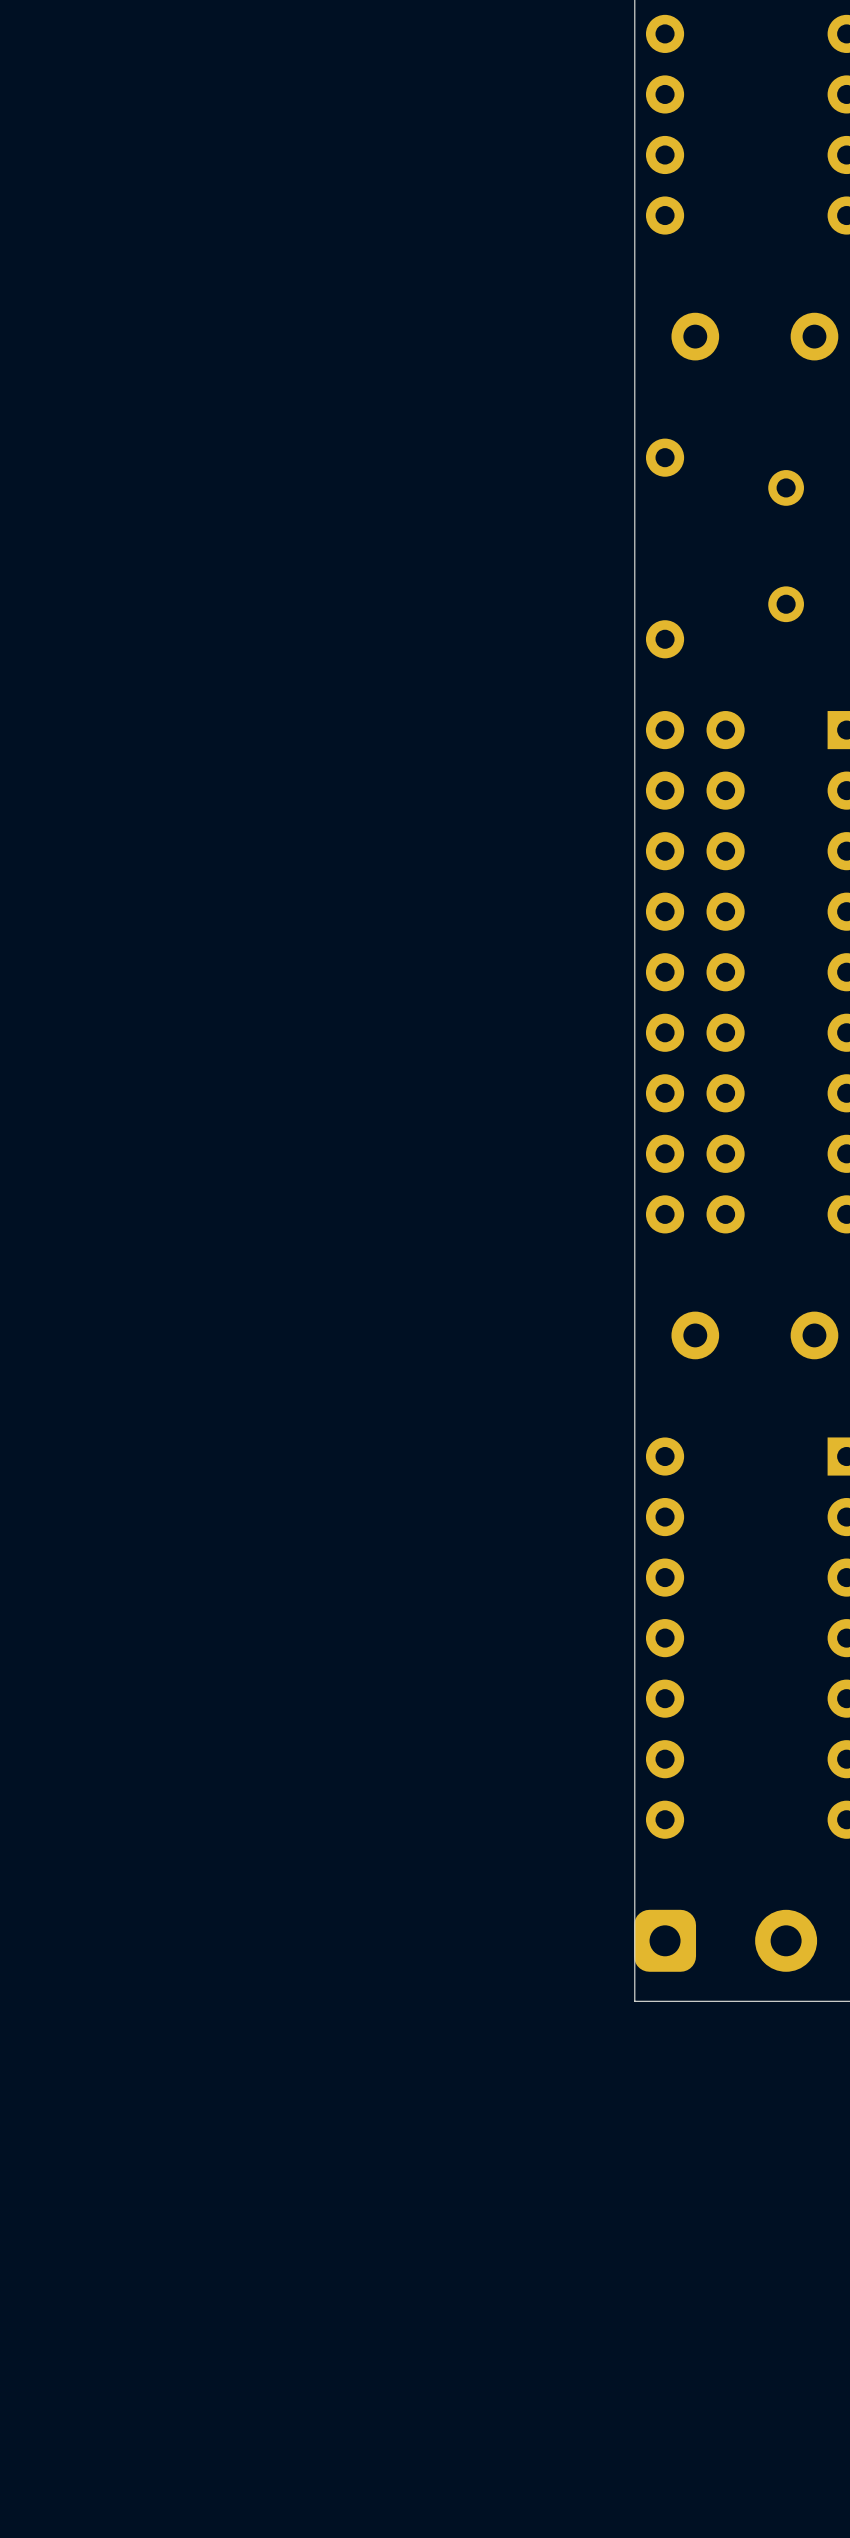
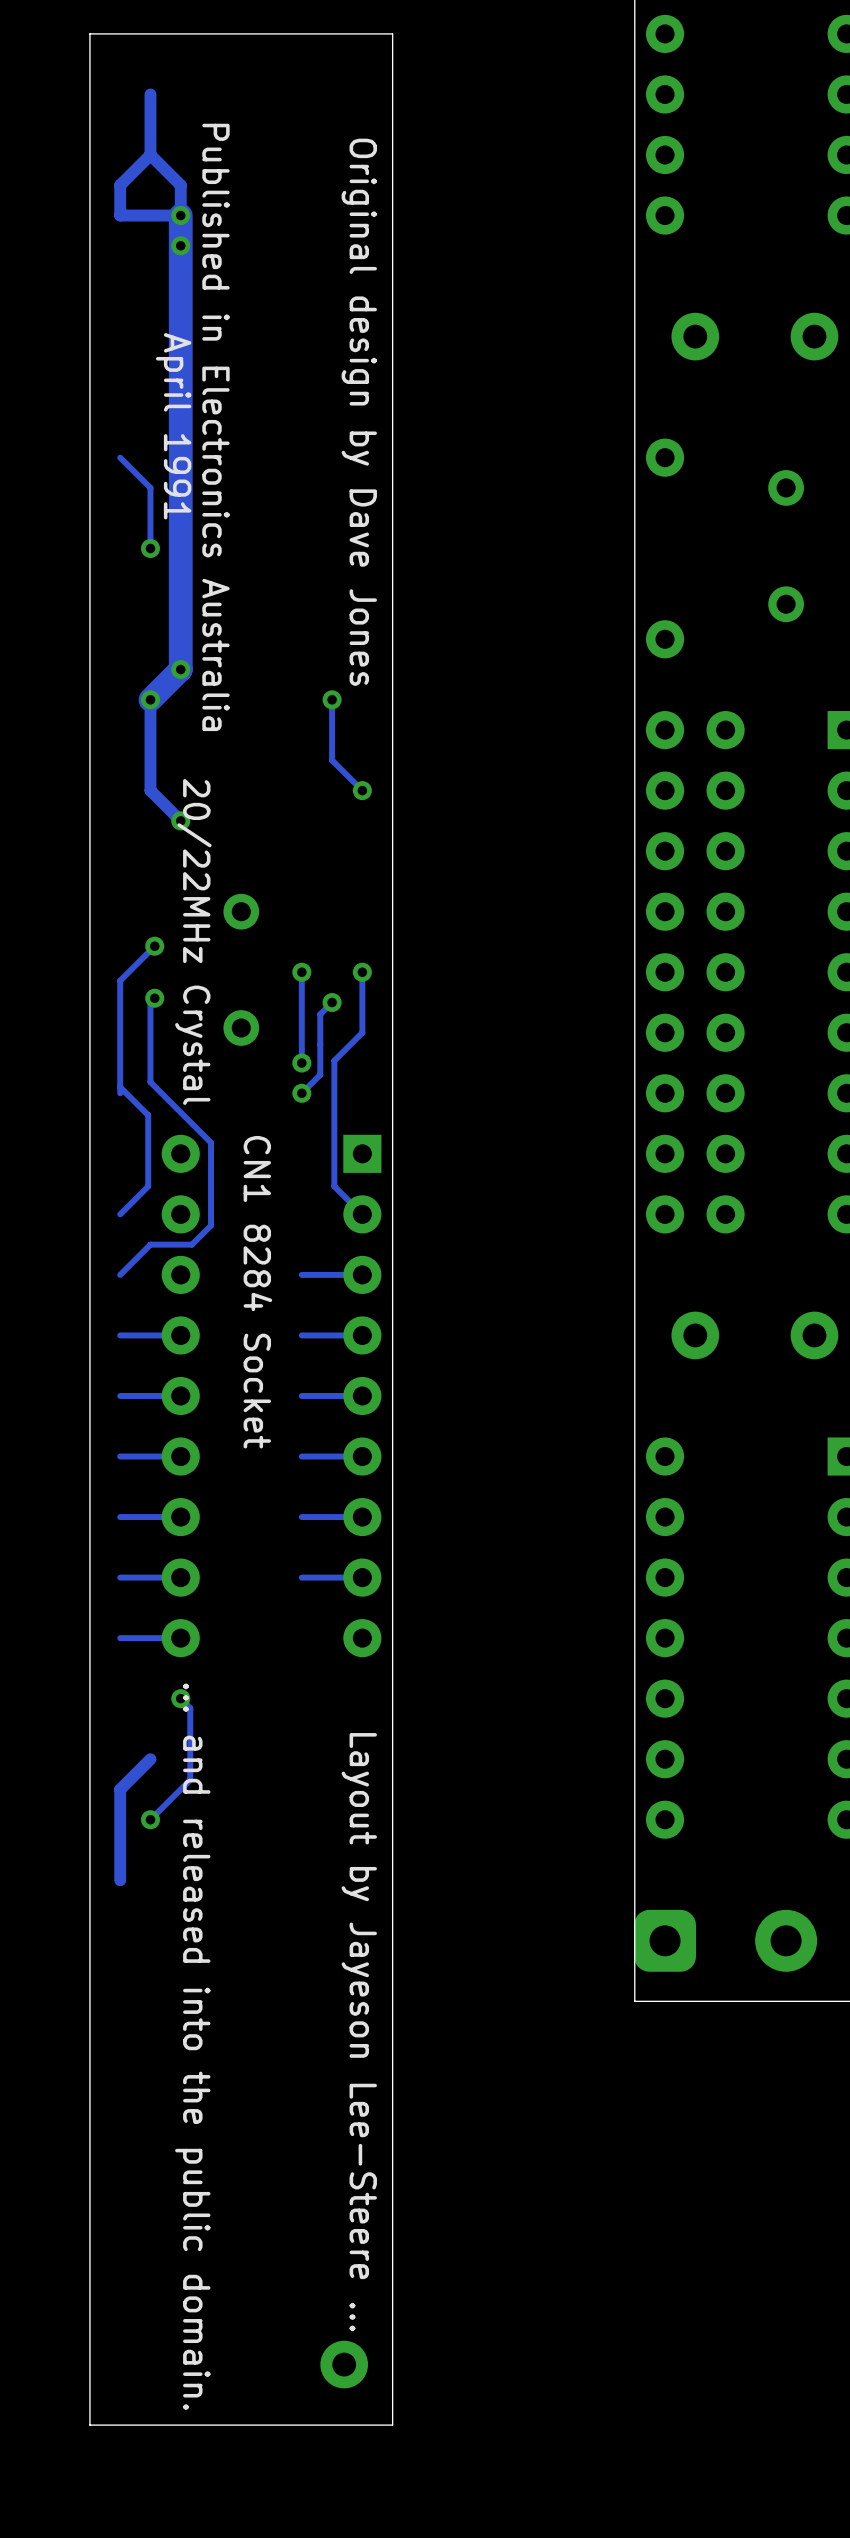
board edge: none -> (392, 33) (392, 2425) (89, 2425) (89, 33) (392, 33)
track: none -> (150, 94) (150, 154)
track: none -> (150, 154) (120, 185) (120, 215) (180, 215)
track: none -> (150, 154) (180, 185) (180, 215)
track: none -> (180, 215) (180, 669) (150, 699) (150, 790) (180, 820)
via: none -> (180, 215)
via: none -> (180, 245)
text: none -> Original design by Dave Jones (359, 412)
text: none -> April 1991 (173, 426)
text: none -> Published in Electronics Australia (215, 427)
track: none -> (120, 457) (150, 487) (150, 548)
via: none -> (150, 548)
via: none -> (180, 669)
via: none -> (150, 699)
track: none -> (332, 699) (332, 760) (362, 790)
via: none -> (332, 699)
via: none -> (362, 790)
via: none -> (180, 820)
track: none -> (154, 946) (120, 980) (120, 1093)
via: none -> (154, 946)
part: none -> 20/22MHz Crystal (241, 969)
track: none -> (301, 972) (301, 1063)
via: none -> (301, 972)
track: none -> (362, 972) (362, 1032) (334, 1060) (334, 1186) (362, 1214)
via: none -> (362, 972)
track: none -> (154, 998) (150, 1002) (150, 1082) (211, 1142) (211, 1225) (191, 1244) (150, 1244) (120, 1274)
via: none -> (154, 998)
track: none -> (332, 1002) (320, 1014) (320, 1074) (301, 1093)
via: none -> (332, 1002)
via: none -> (301, 1063)
track: none -> (120, 1087) (148, 1115) (148, 1186) (120, 1214)
via: none -> (301, 1093)
track: none -> (362, 1274) (301, 1274)
track: none -> (180, 1335) (120, 1335)
track: none -> (362, 1335) (301, 1335)
track: none -> (180, 1395) (120, 1395)
CN1: none -> 8284 Socket (271, 1395)
track: none -> (362, 1395) (301, 1395)
track: none -> (180, 1456) (120, 1456)
track: none -> (362, 1456) (301, 1456)
track: none -> (180, 1517) (120, 1517)
track: none -> (362, 1517) (301, 1517)
track: none -> (180, 1577) (120, 1577)
track: none -> (362, 1577) (301, 1577)
track: none -> (180, 1638) (120, 1638)
track: none -> (180, 1698) (190, 1708) (190, 1779) (150, 1819)
via: none -> (180, 1698)
track: none -> (150, 1759) (120, 1789) (120, 1880)
via: none -> (150, 1819)
text: none -> Layout by Jayeson Lee-Steere ... (359, 2032)
text: none -> ... and released into the public domain. (192, 2046)
part: none -> (344, 2364)

